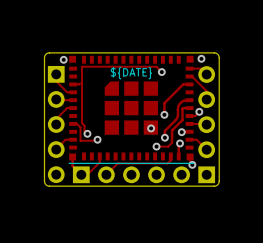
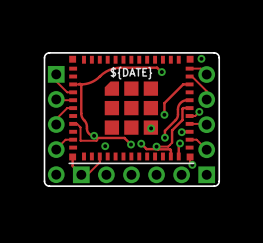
via: (63, 59) -> none
track: (161, 72) (156, 66) (82, 66) (82, 123) (87, 133) -> (161, 72) (157, 67) (116, 67) (106, 71) (91, 82) (79, 84)
track: none -> (81, 84) (81, 115) (88, 133) (96, 137) (124, 137) (131, 144)
via: (87, 133) -> none
via: none -> (94, 135)
via: (97, 139) -> none
via: none -> (141, 143)
via: none -> (131, 144)
via: none -> (105, 146)
track: (170, 156) (170, 160) (167, 163) (117, 163) (106, 174) -> (170, 156) (170, 149) (146, 149) (141, 143)

